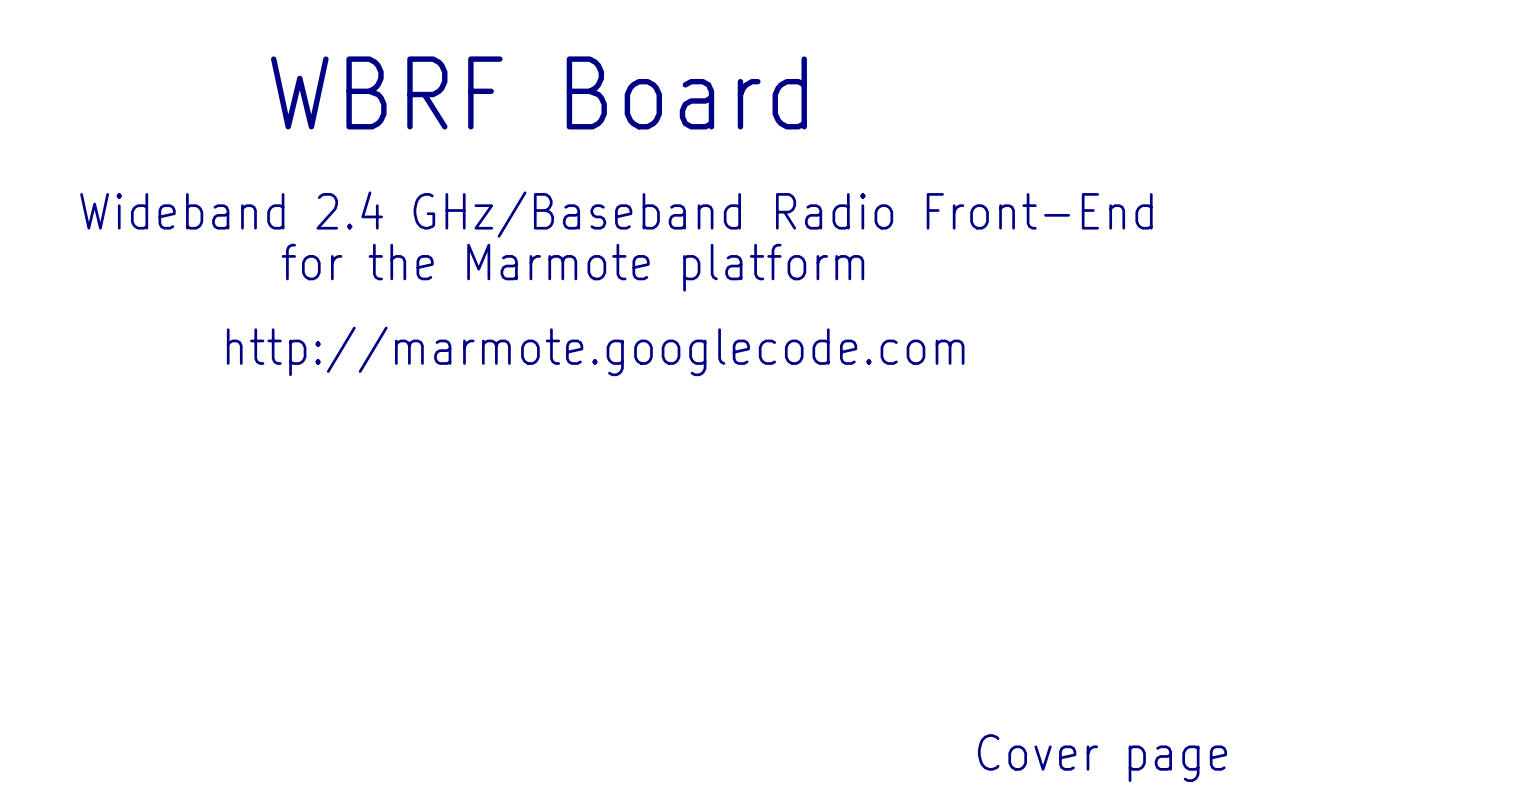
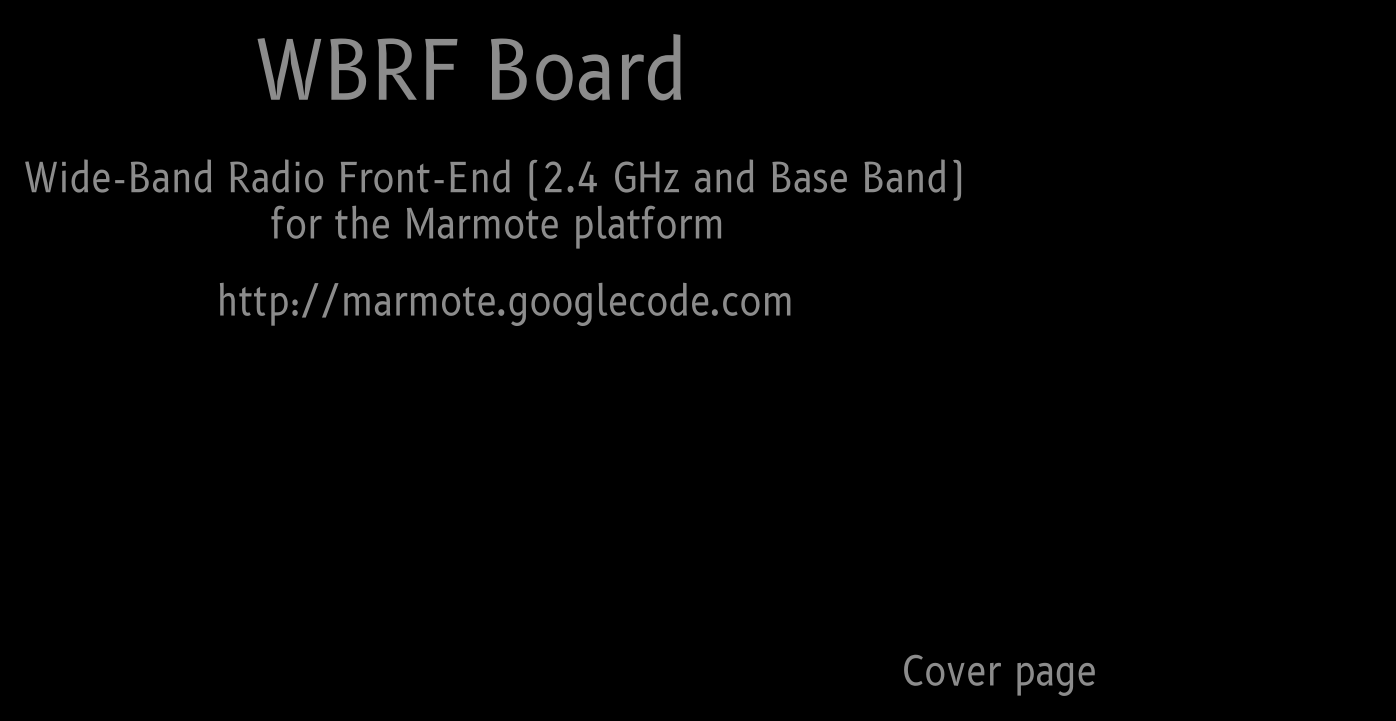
text: Wideband 2.4 GHz/Baseband Radio Front-End (616, 214) -> none
text: none -> Wide-Band Radio Front-End (2.4 GHz and Base Band) (493, 180)

